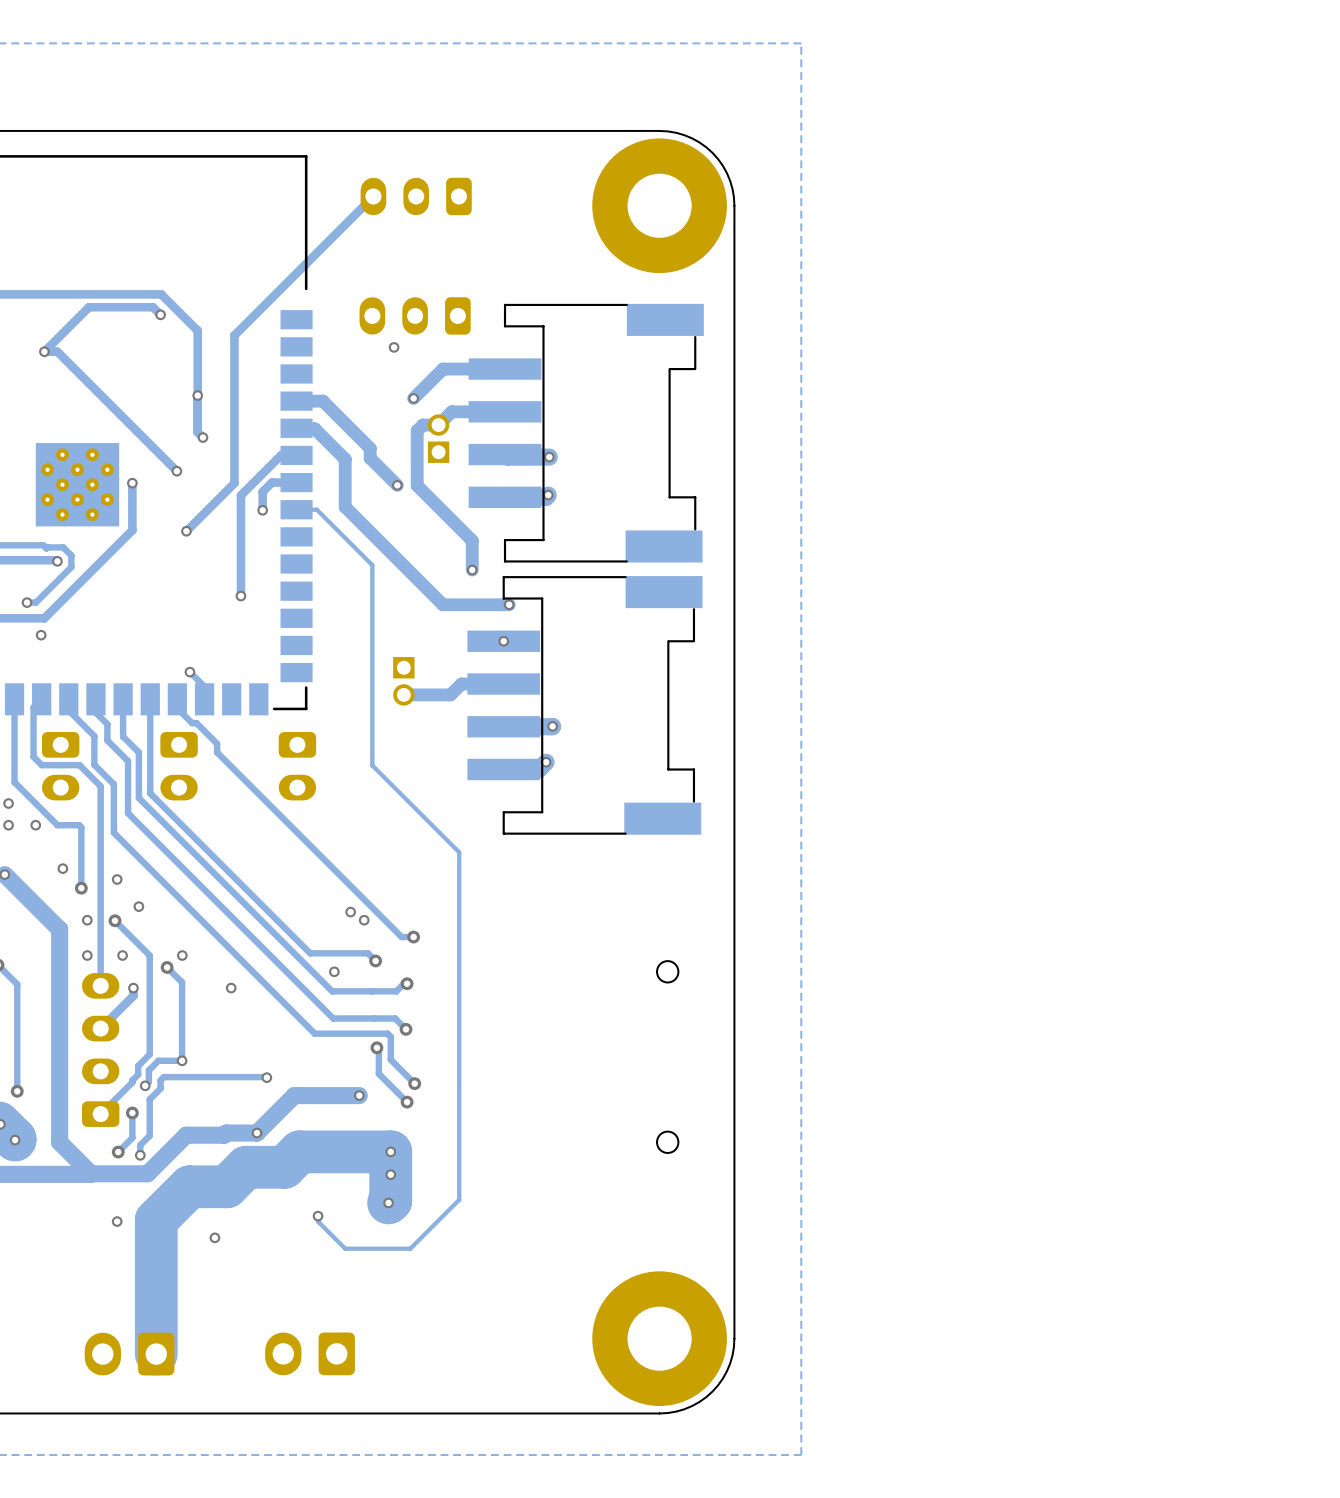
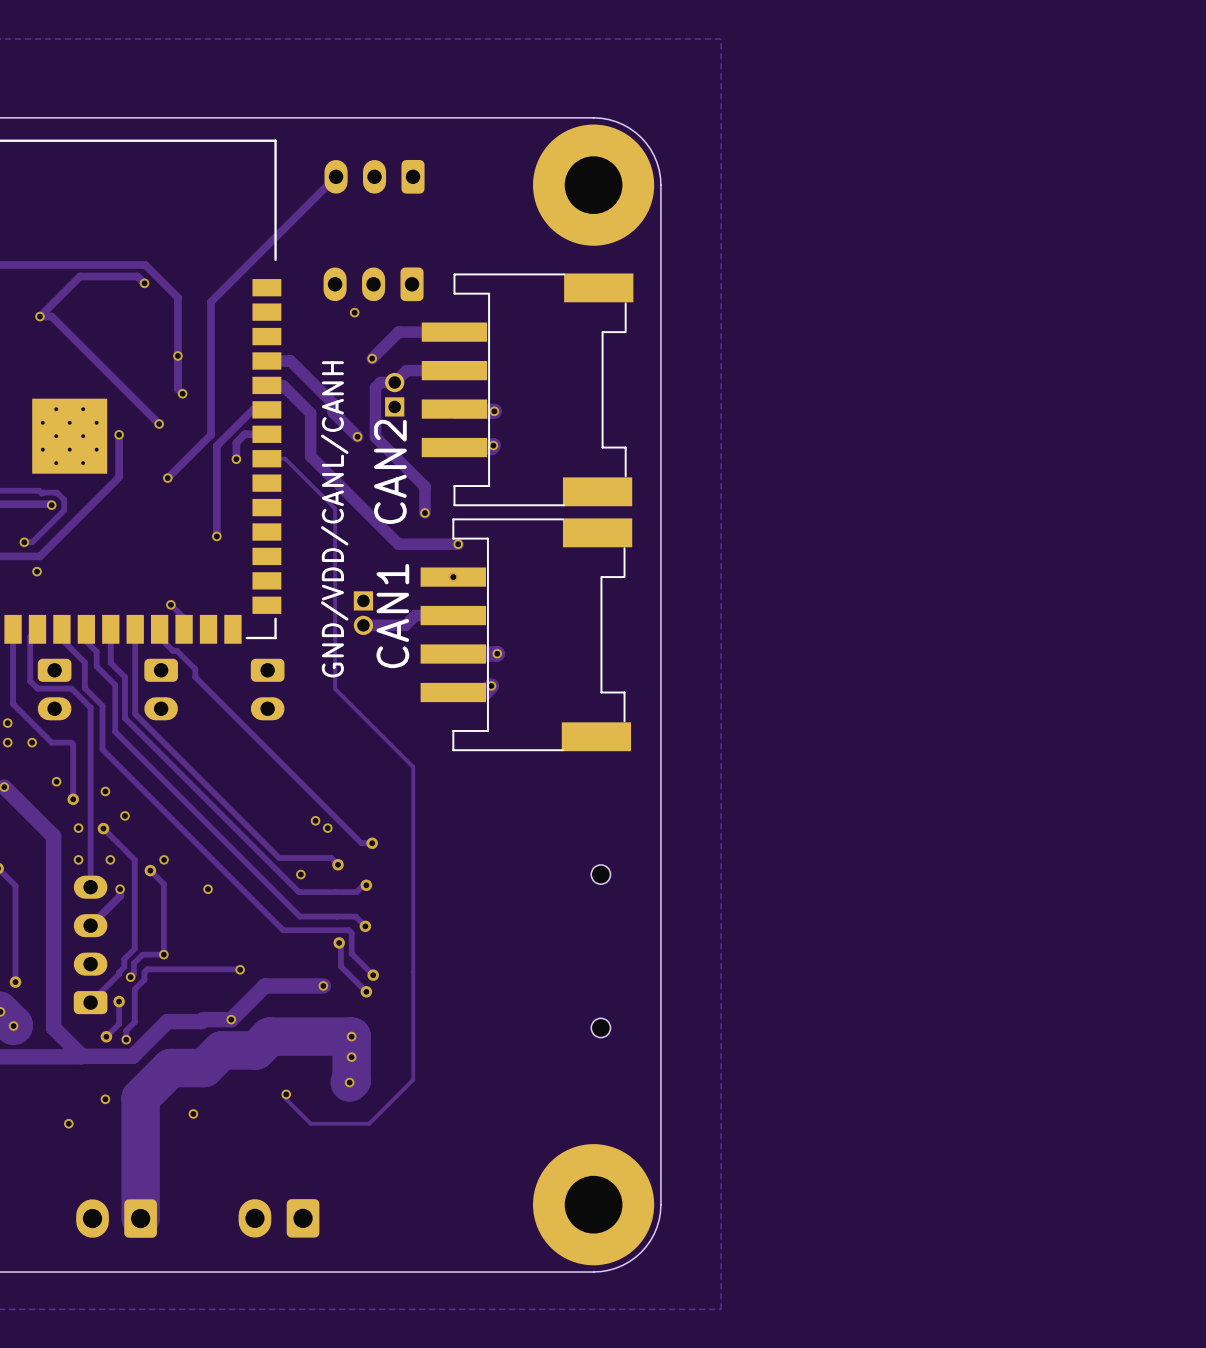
text: none -> CAN2 (390, 471)
text: none -> GND/VDD/CANL/CANH (334, 519)
text: none -> CAN1 (392, 616)
via: none -> (68, 1123)

